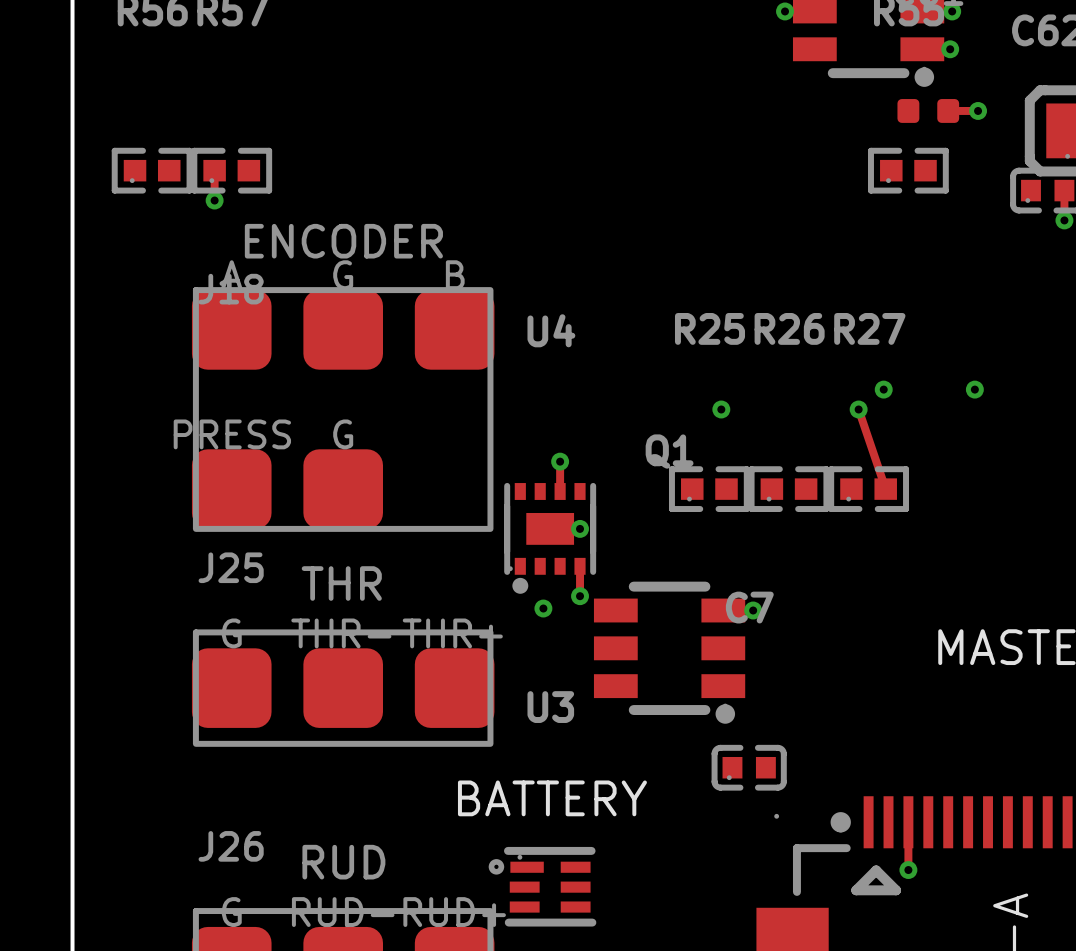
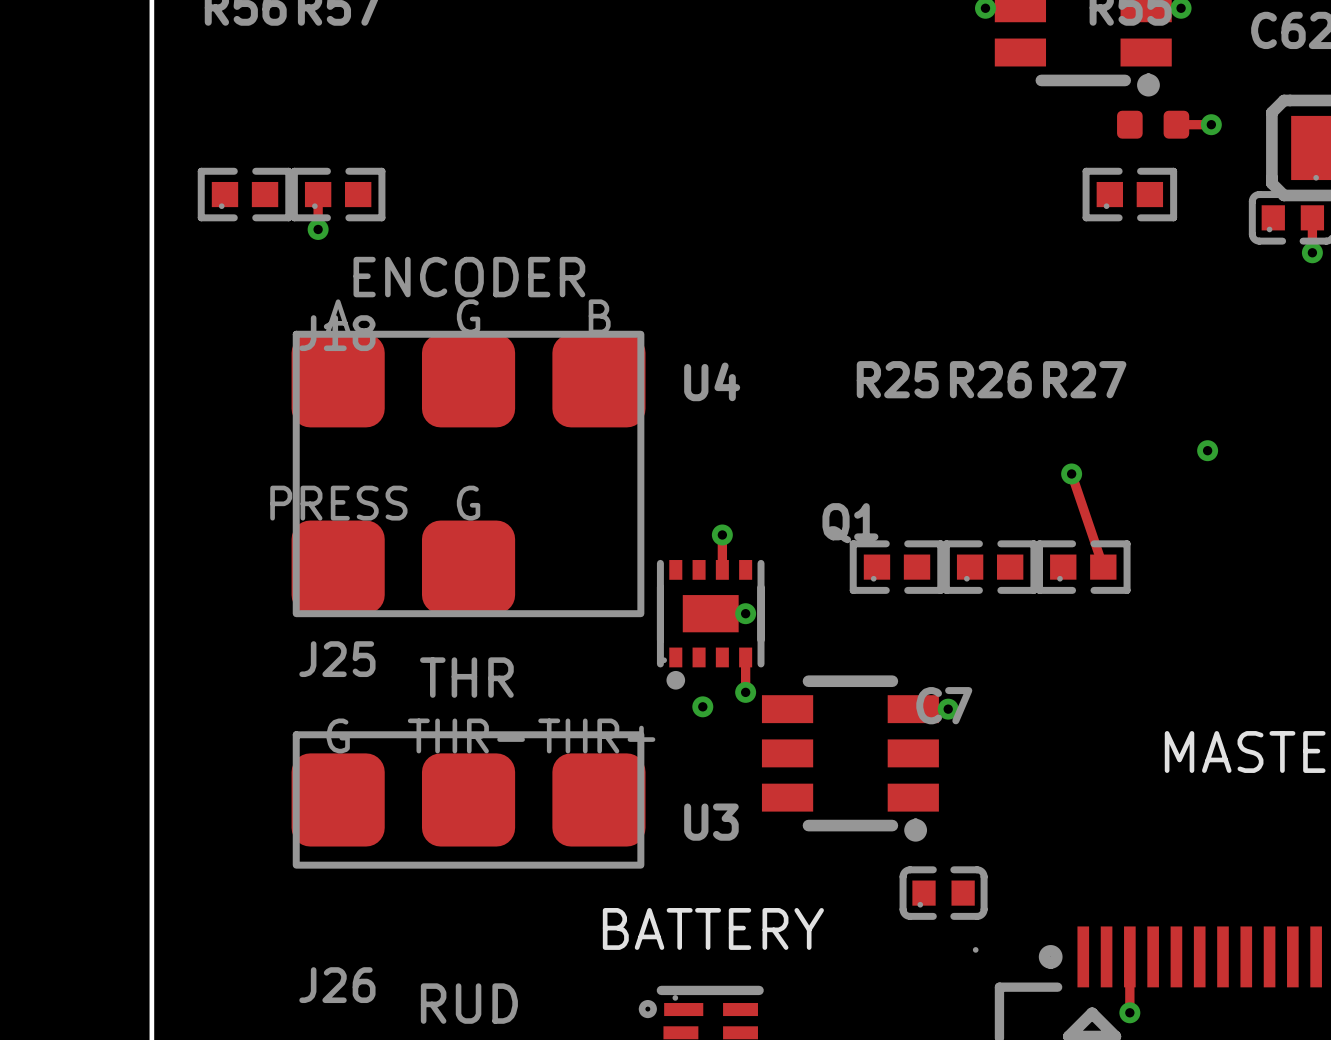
via: (950, 49) -> none
via: (883, 389) -> none
via: (721, 409) -> none

